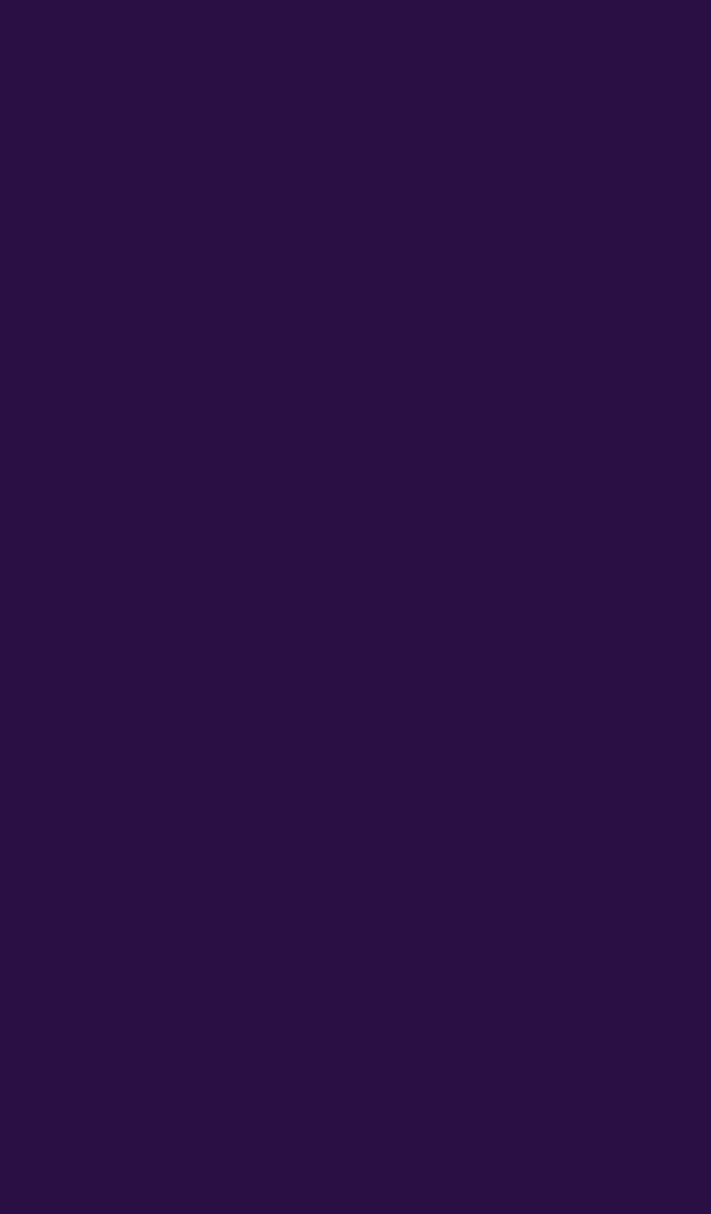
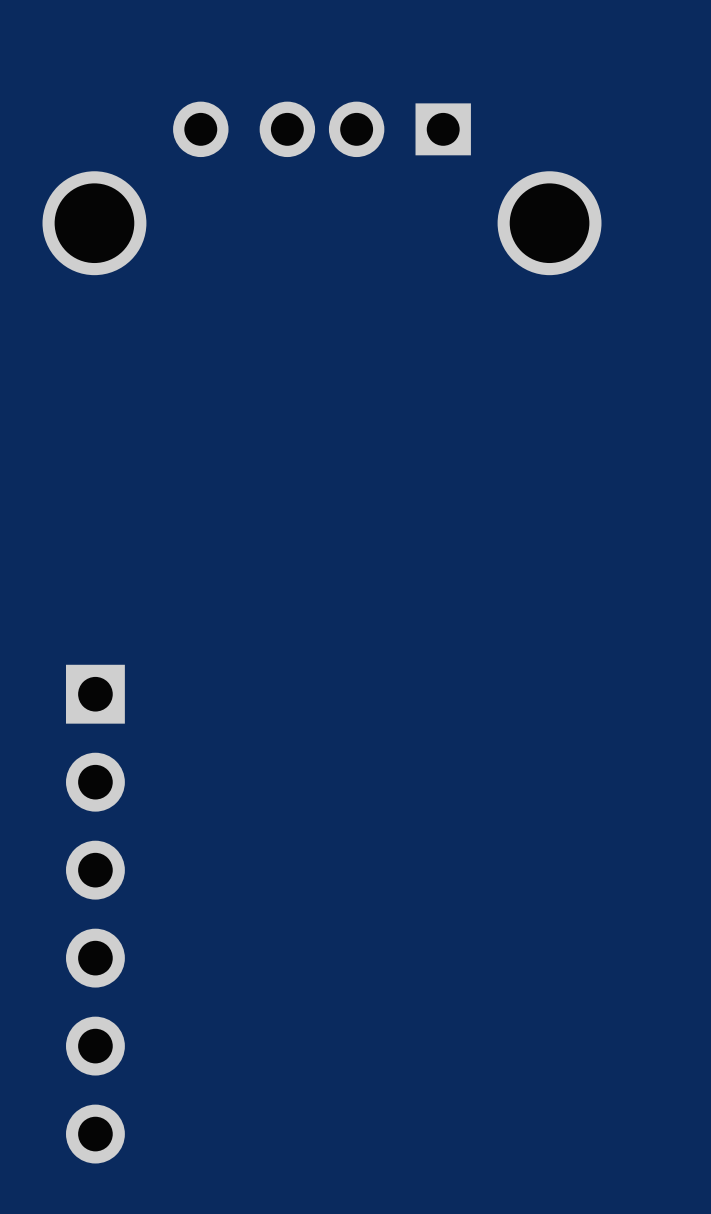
part: none -> (322, 188)
part: none -> (95, 914)

